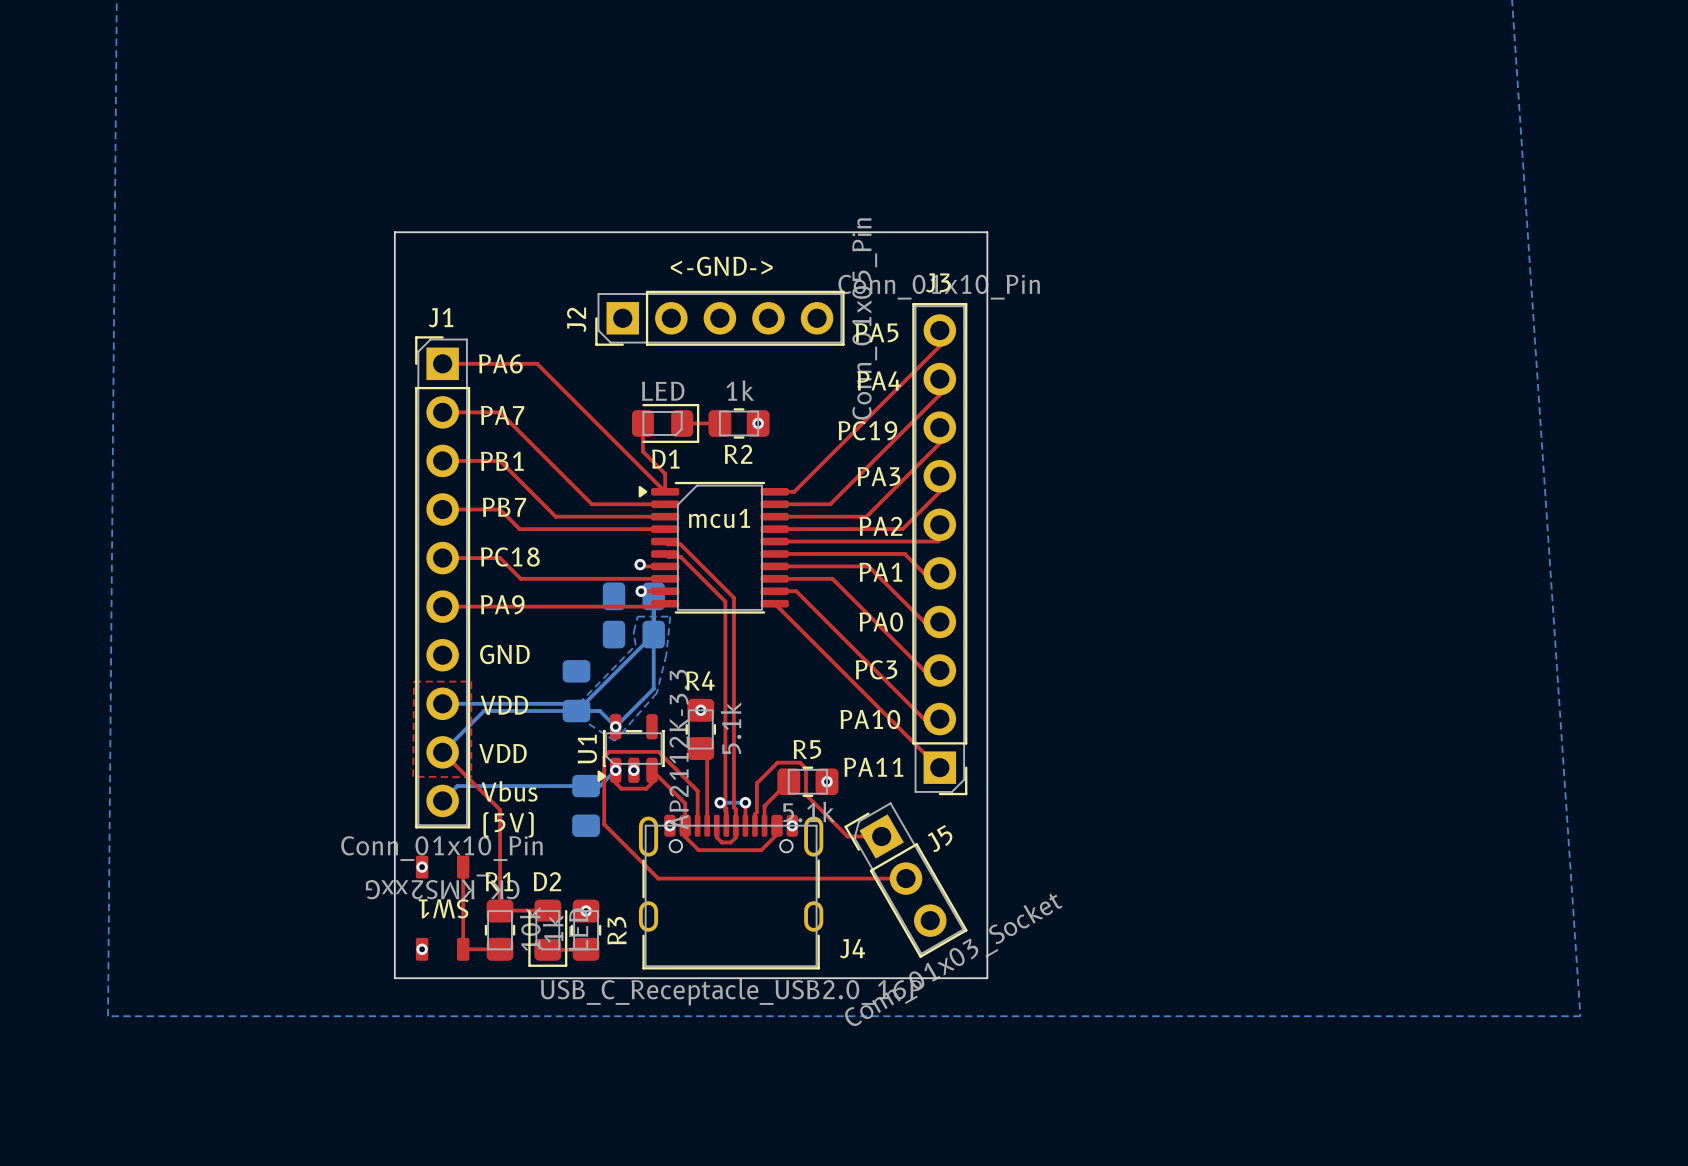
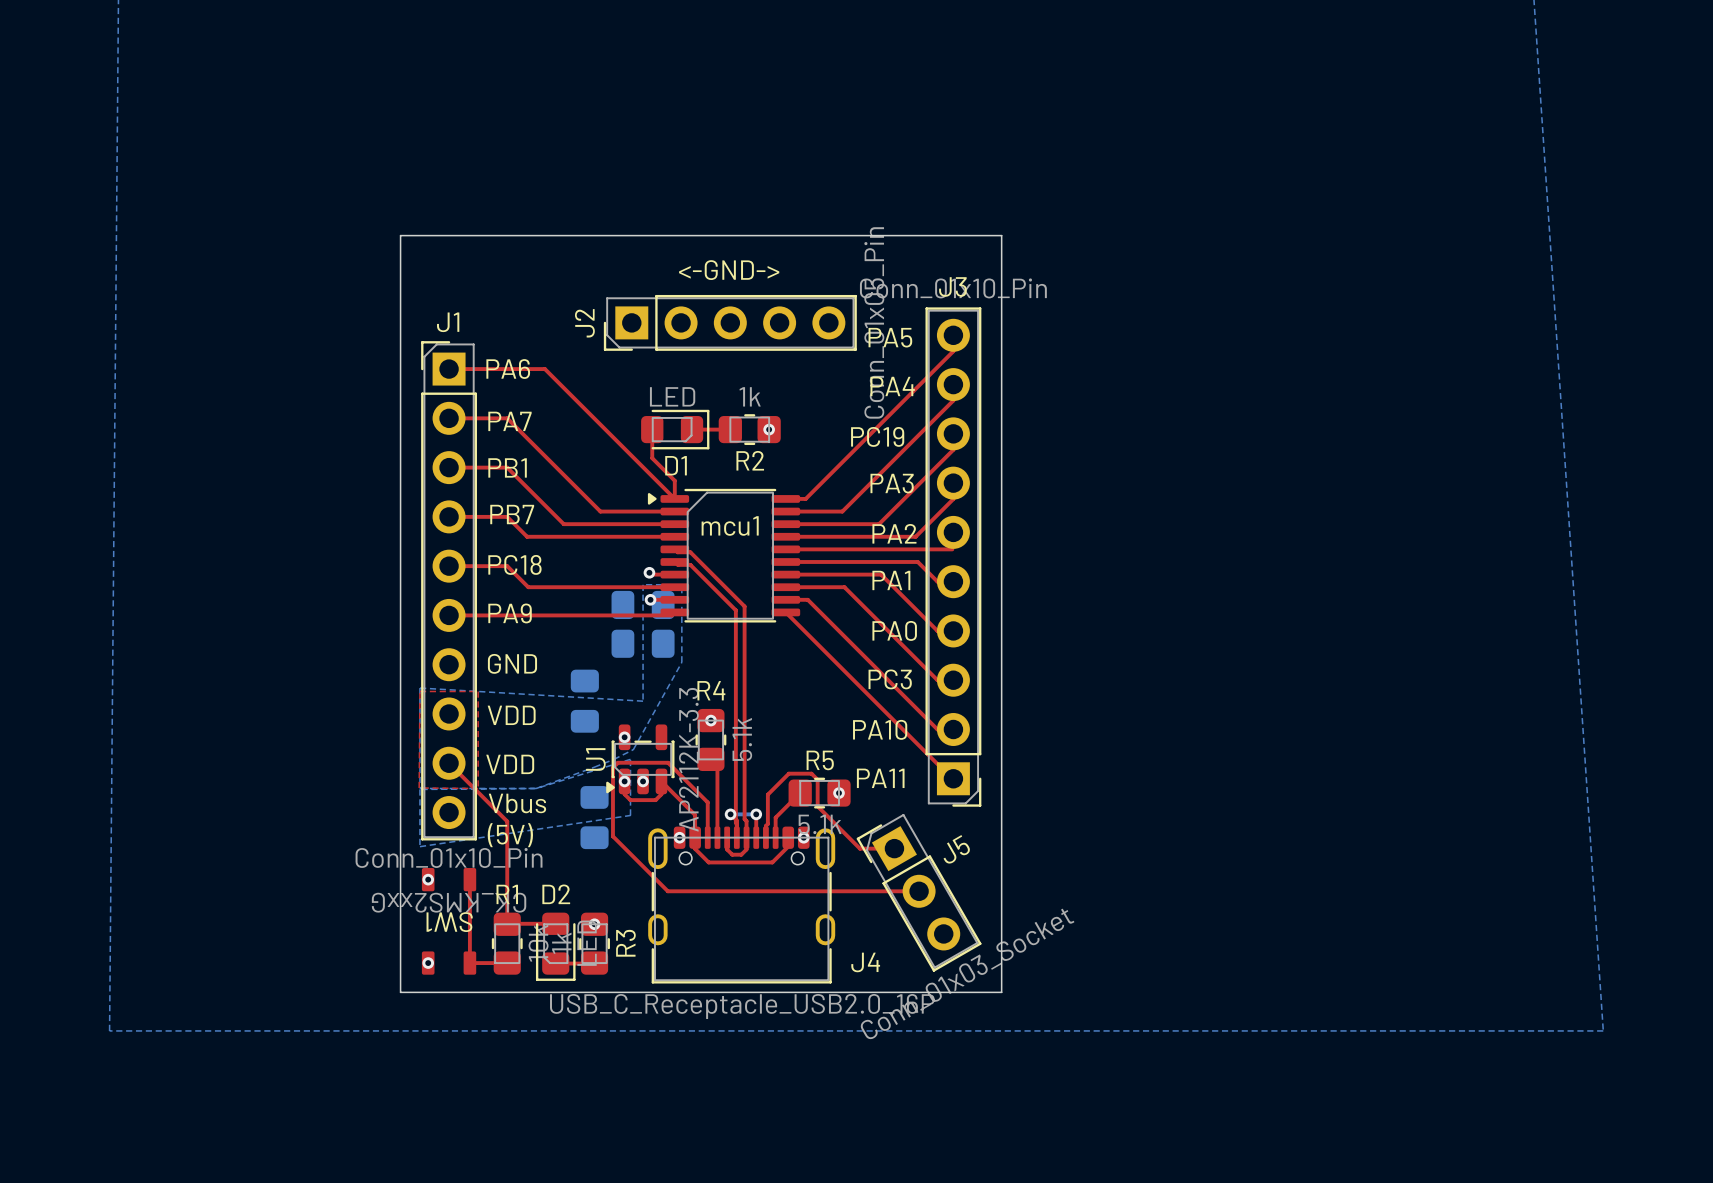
bottom track: (653, 596) (653, 688) (615, 726) (599, 711) (484, 711) (442, 752) -> none
bottom zone outline: (633, 631) (637, 616) (670, 616) (666, 654) (656, 693) (614, 740) (570, 712) (635, 645) (633, 634) -> (643, 641) (643, 584) (681, 584) (681, 662) (633, 749) (594, 767) (536, 788)
bottom zone outline: none -> (643, 643) (643, 701) (419, 688) (419, 788) (536, 788)
bottom track: (653, 634) (577, 711) -> none
bottom track: (442, 703) (569, 703) (576, 711) -> none
bottom track: (615, 770) (599, 786) (457, 786) (442, 800) -> none
bottom zone outline: none -> (536, 788) (419, 789) (419, 846) (630, 815) (630, 759) (536, 788)

